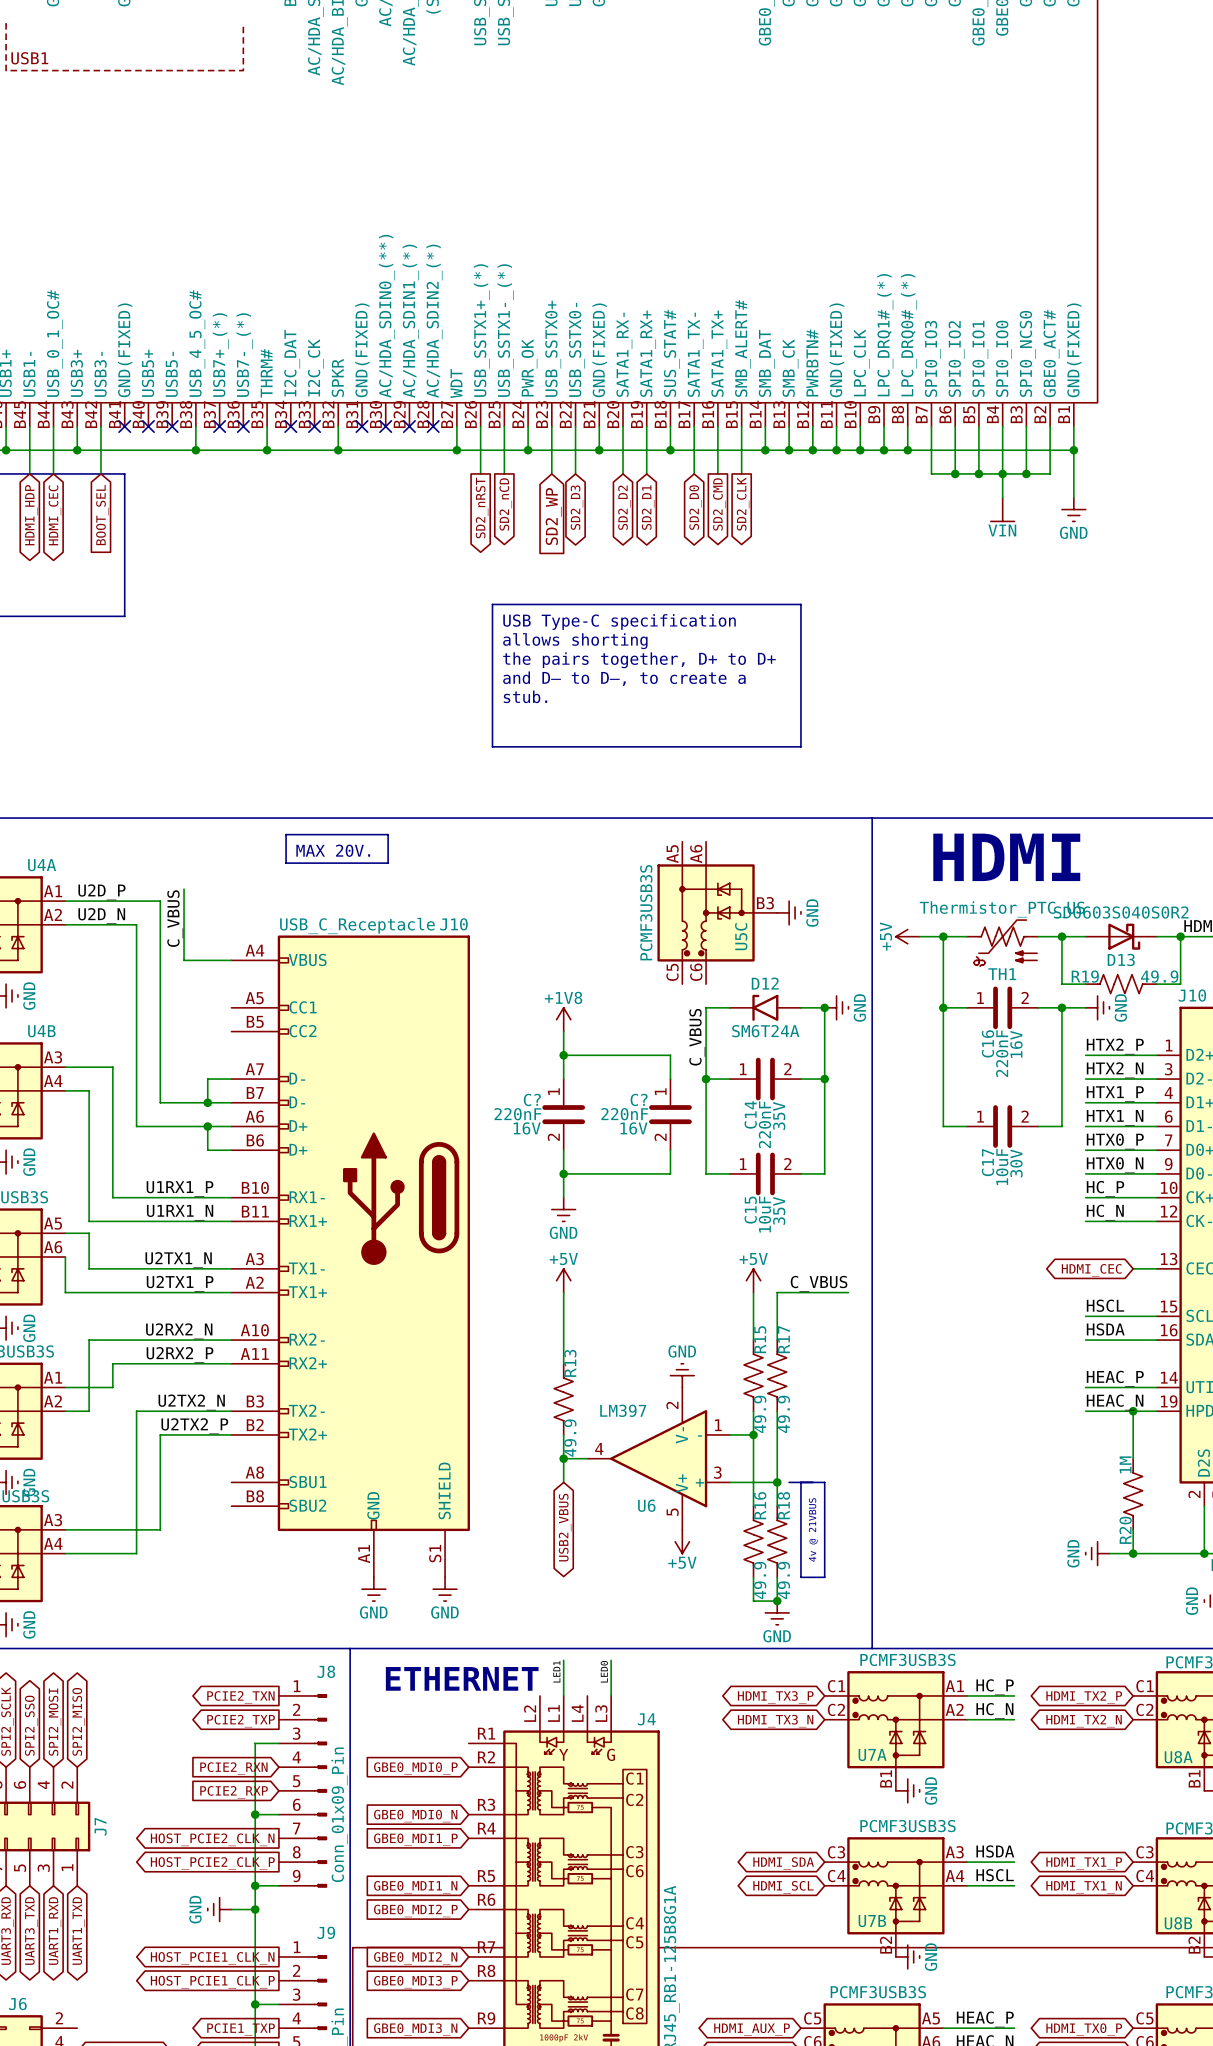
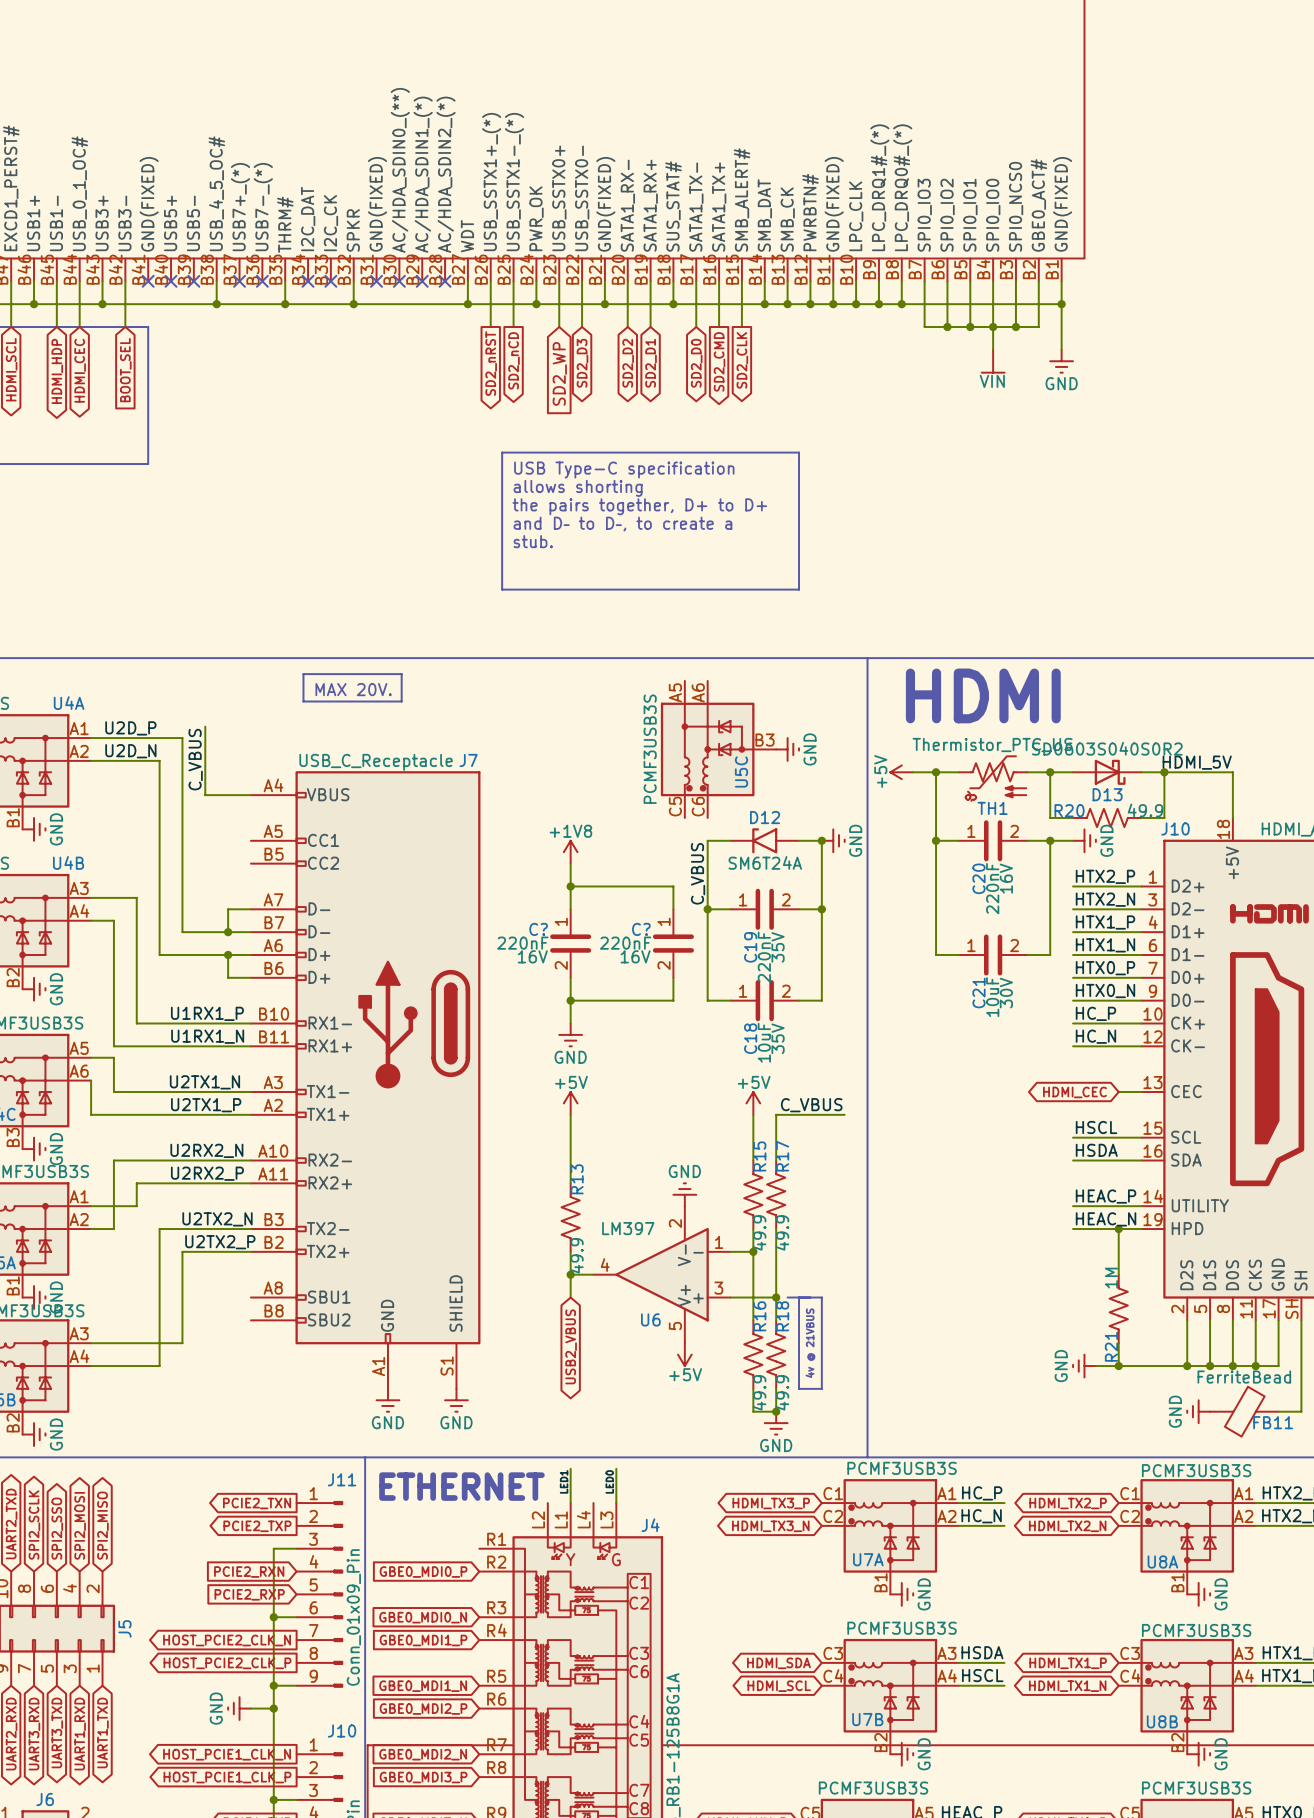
J10 name: J10 (453, 924) -> J7 (468, 760)
R19 name: R19 (1085, 976) -> R20 (1069, 810)
C16 name: C16 (987, 1043) -> C20 (978, 878)
C14 name: C14 (750, 1114) -> C19 (750, 947)
C17 name: C17 (987, 1162) -> C21 (978, 993)
C15 name: C15 (750, 1210) -> C18 (750, 1038)
R20 name: R20 (1125, 1530) -> R21 (1111, 1346)
J8 name: J8 (326, 1671) -> J11 (342, 1479)
J7 name: J7 (100, 1826) -> J5 (124, 1628)
J9 name: J9 (326, 1932) -> J10 (342, 1730)

